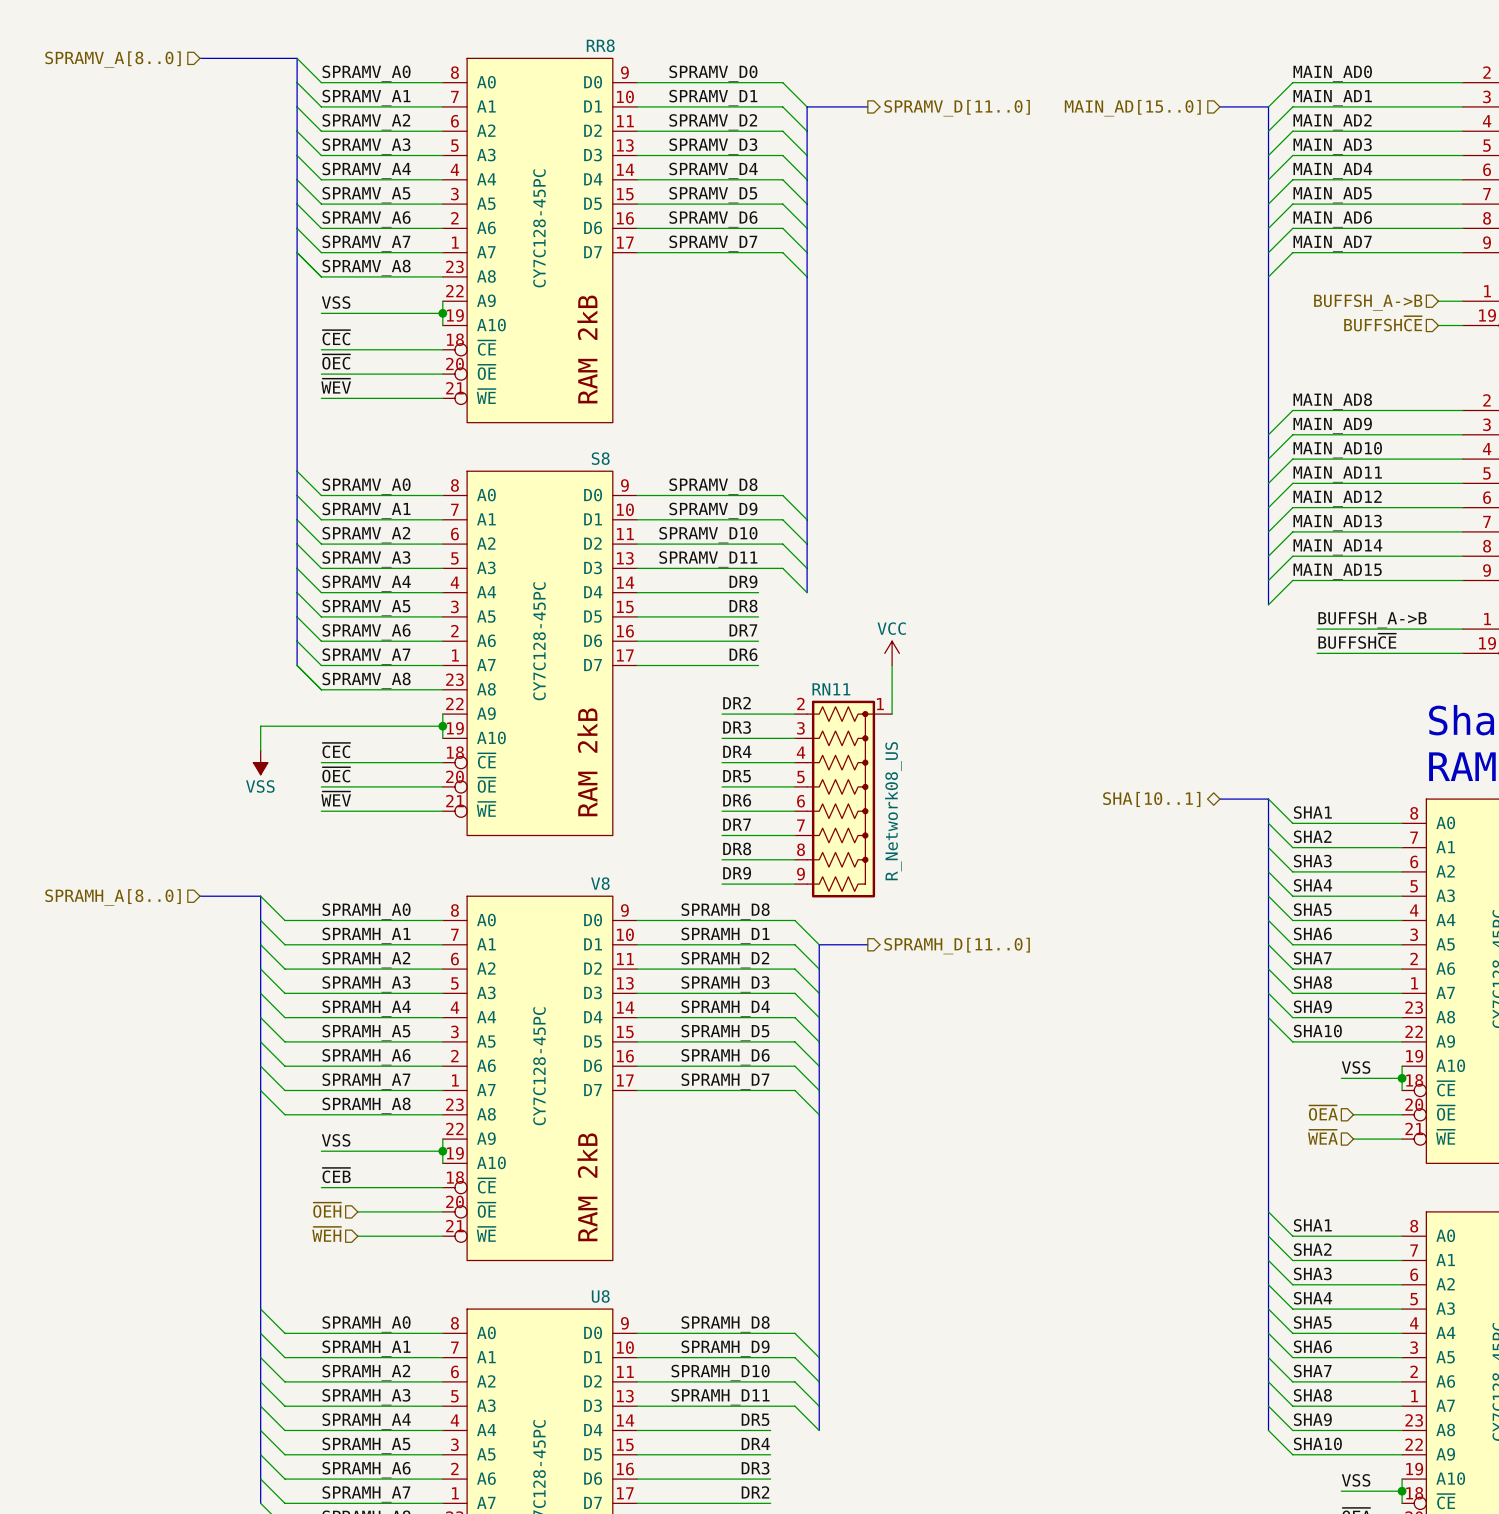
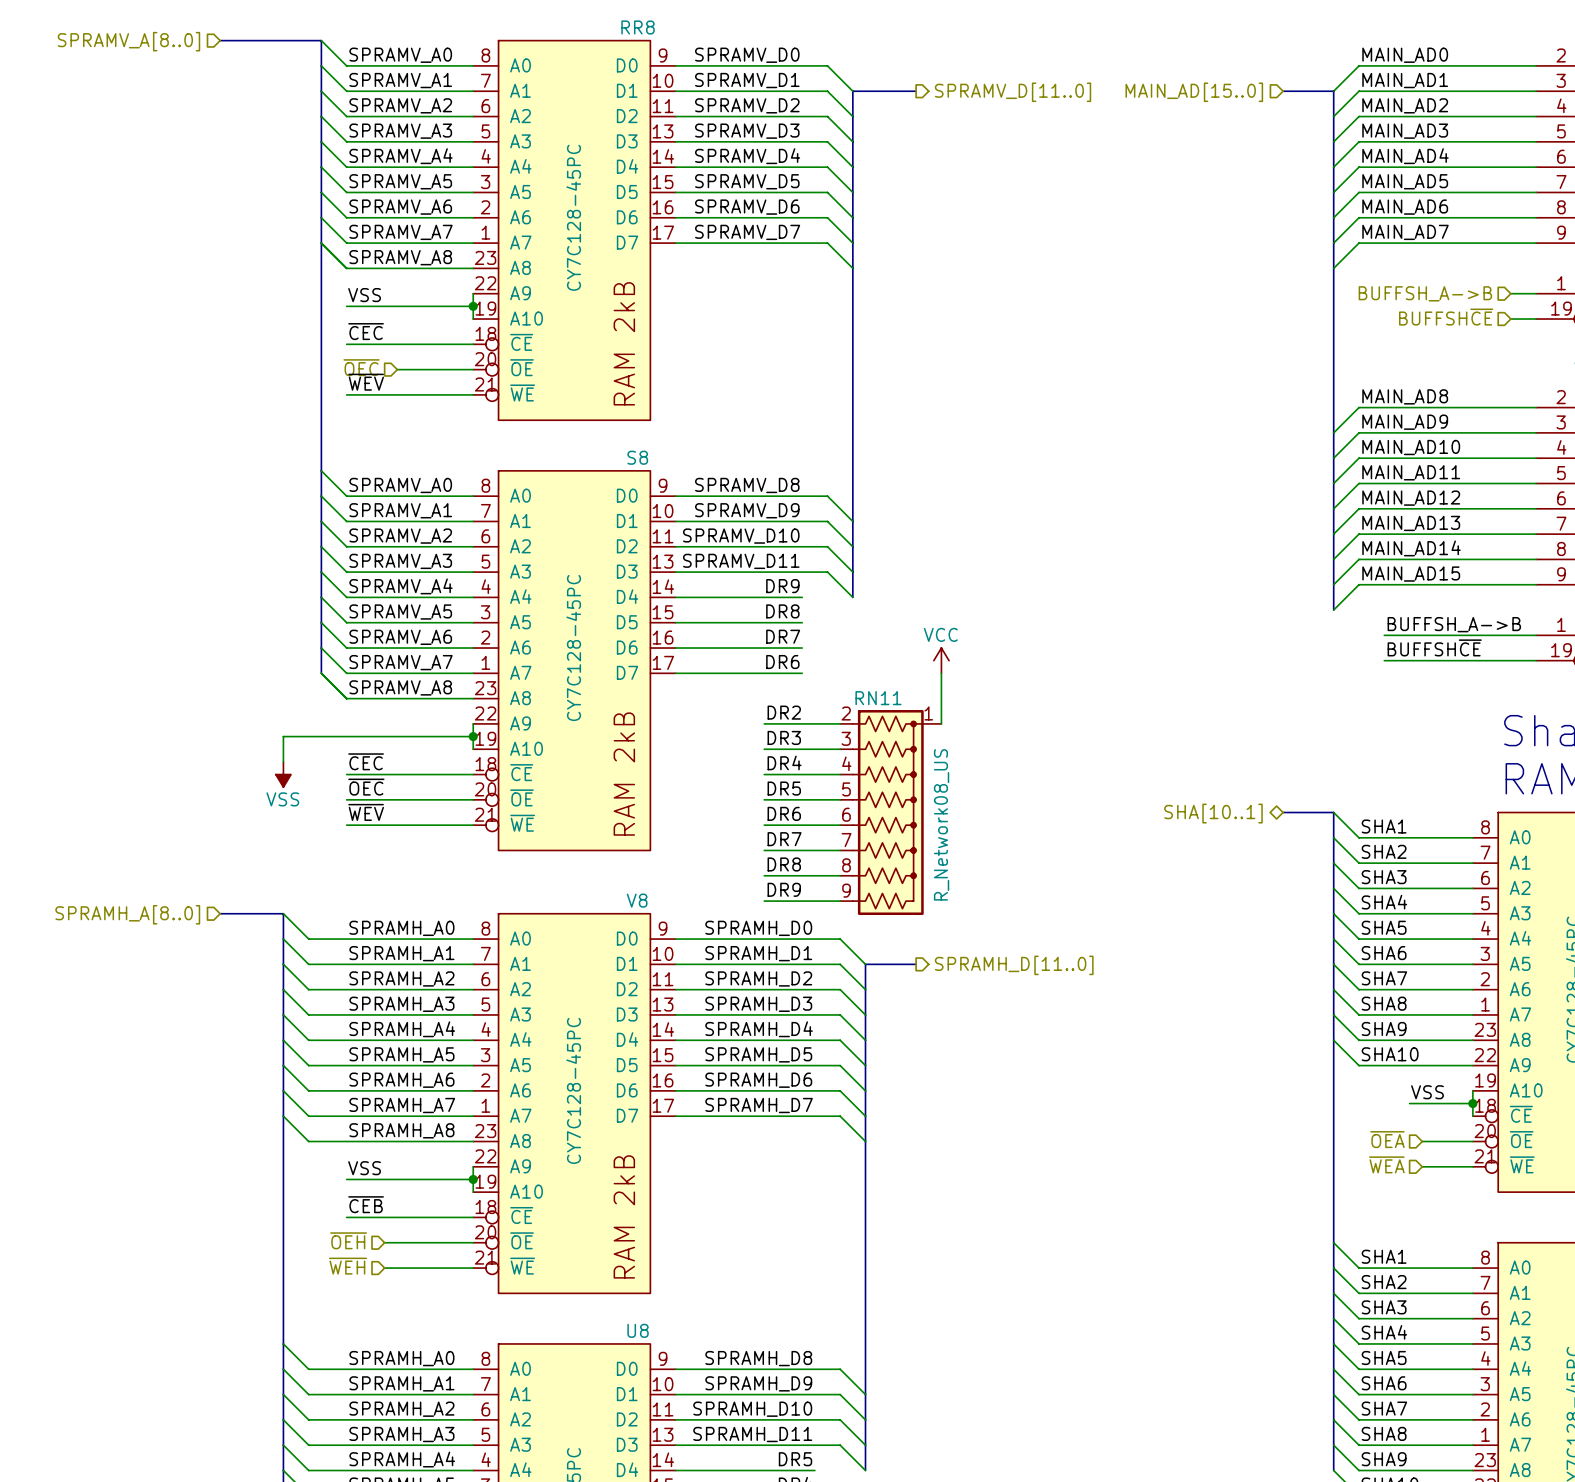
label: ~{OEC} (336, 361) -> none
hierarchical label: none -> ~{OEC} (361, 367)
wire: (321, 374) (369, 374) -> none
label: SPRAMH_D8 (725, 911) -> SPRAMH_D0 (758, 928)

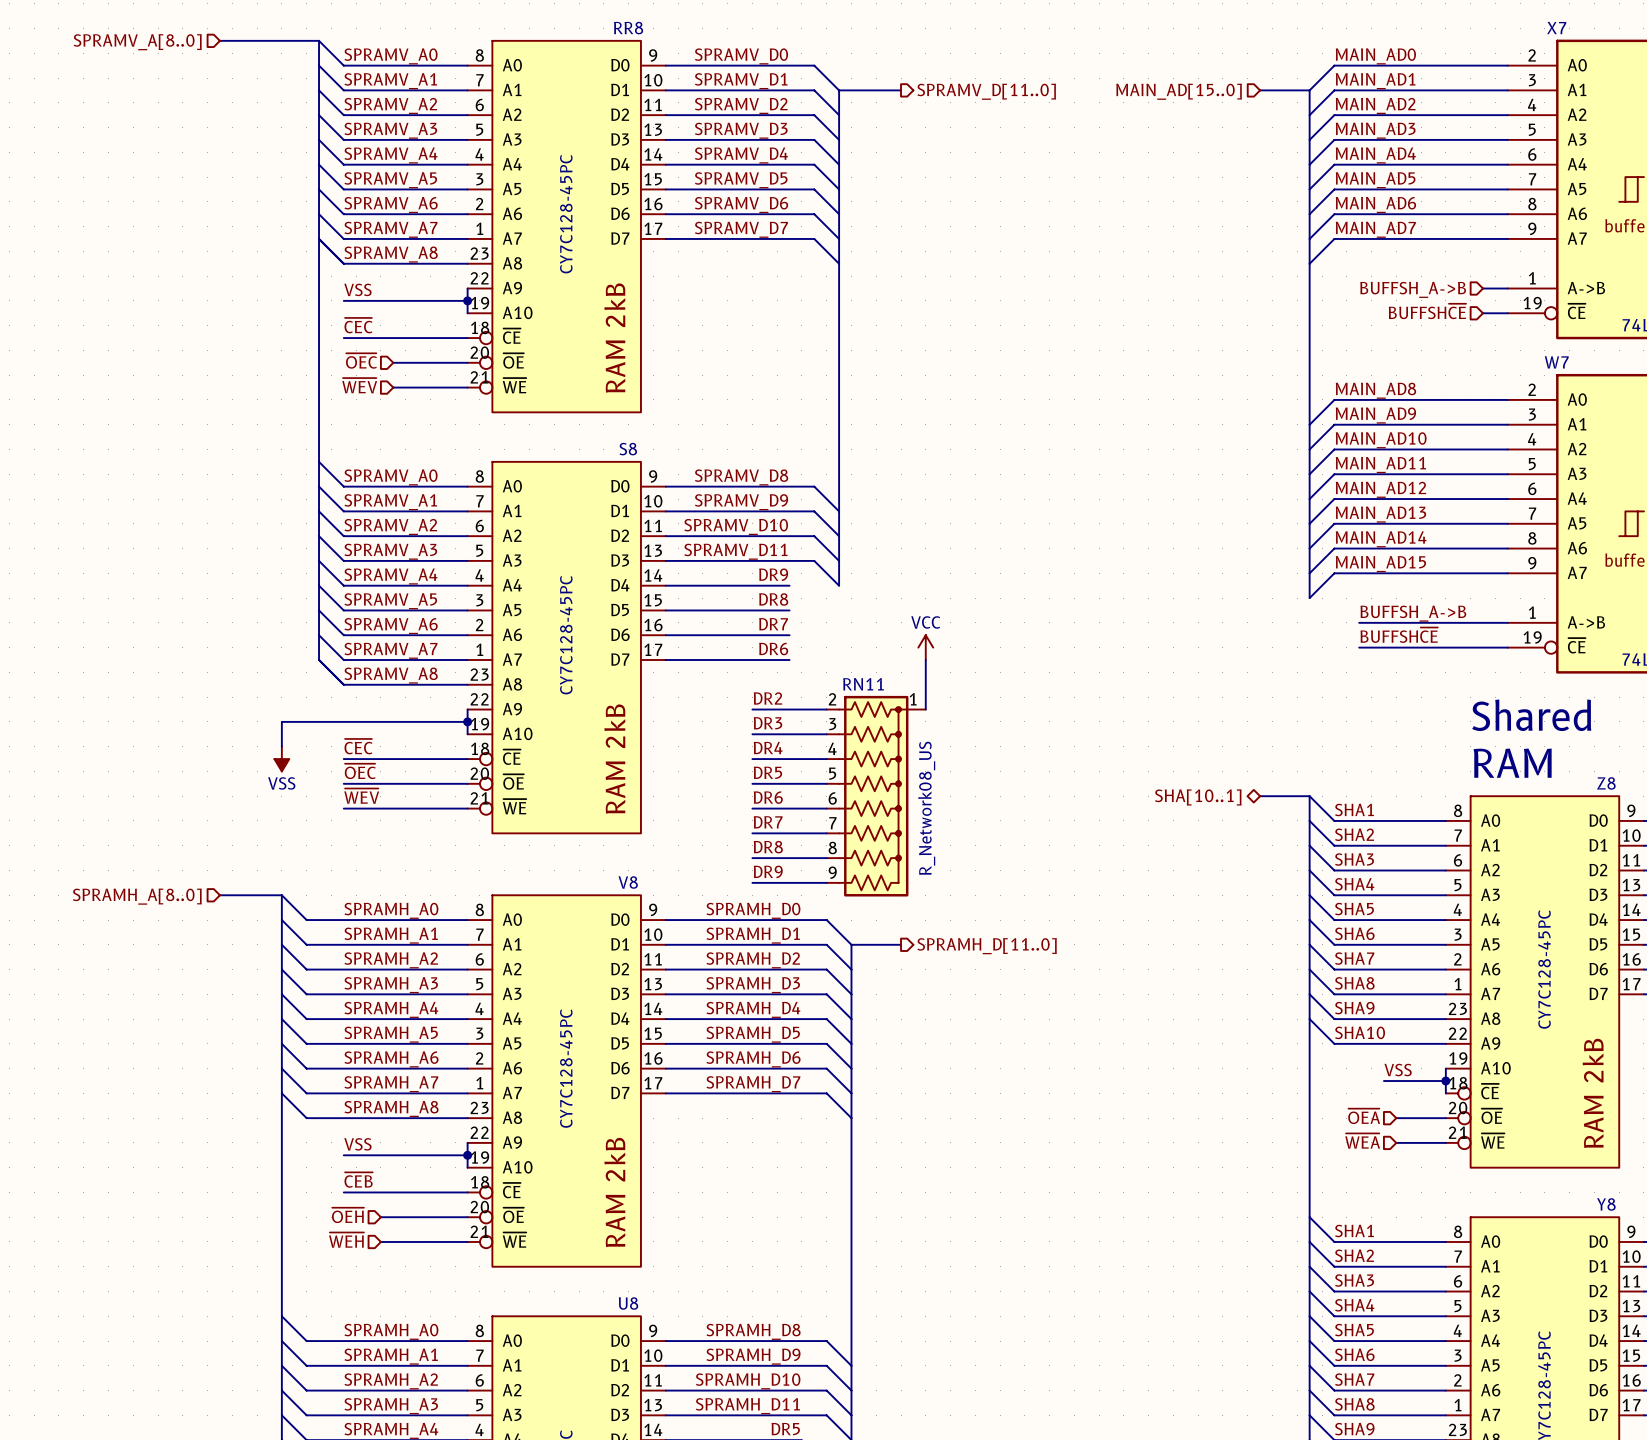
label: ~{WEV} (366, 382) -> none
hierarchical label: none -> ~{WEV} (359, 385)
wire: (346, 394) (397, 394) -> none

